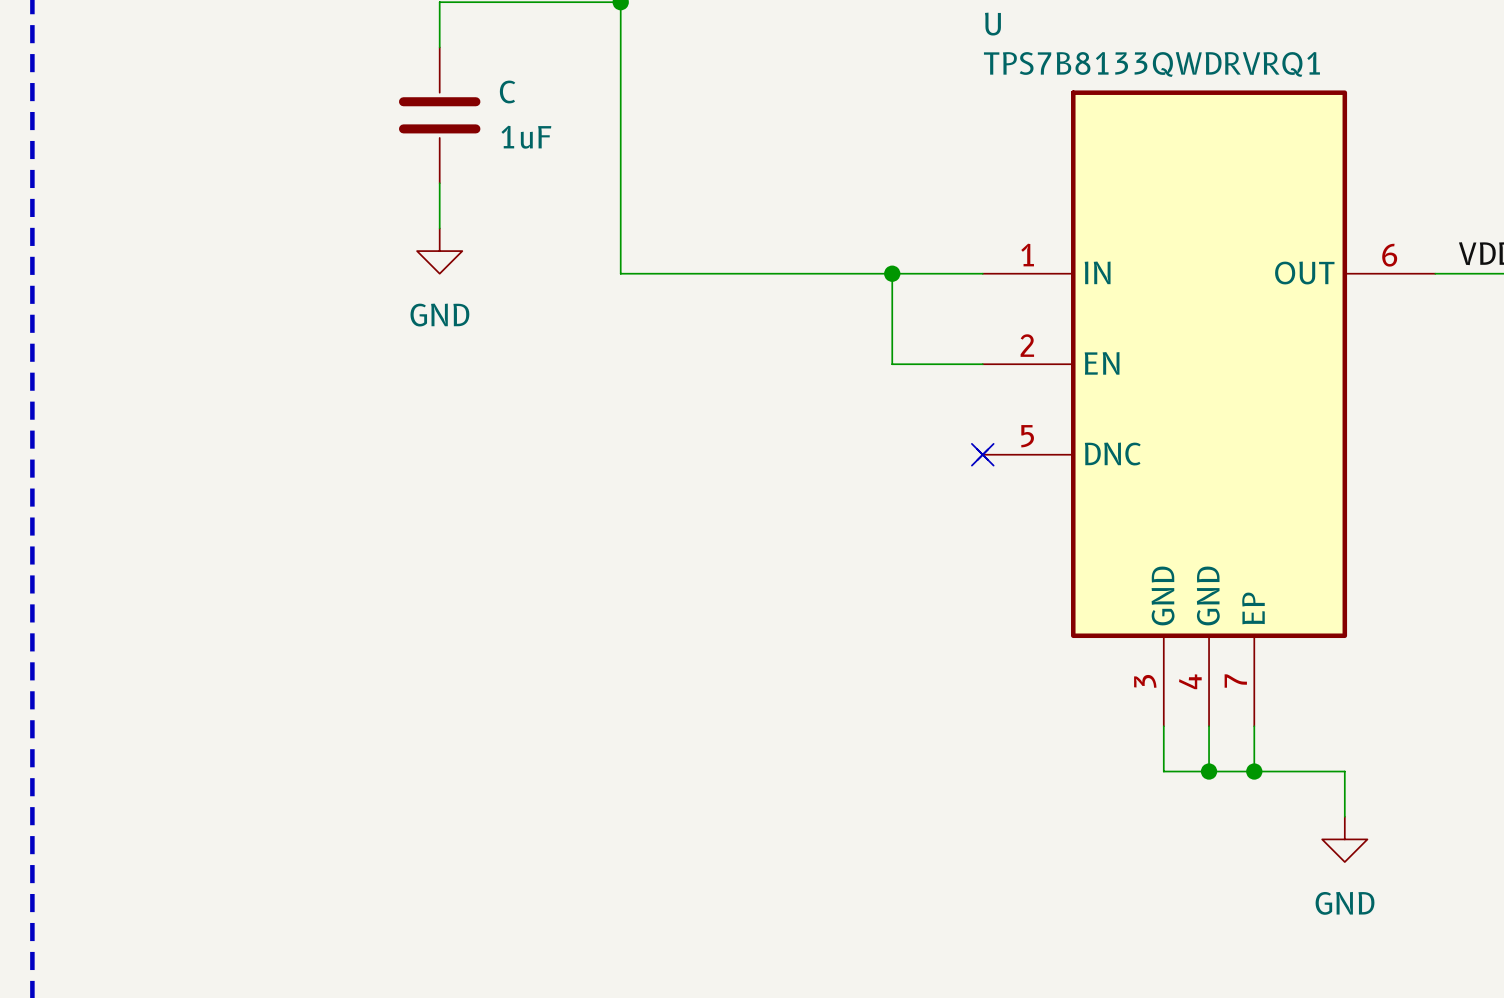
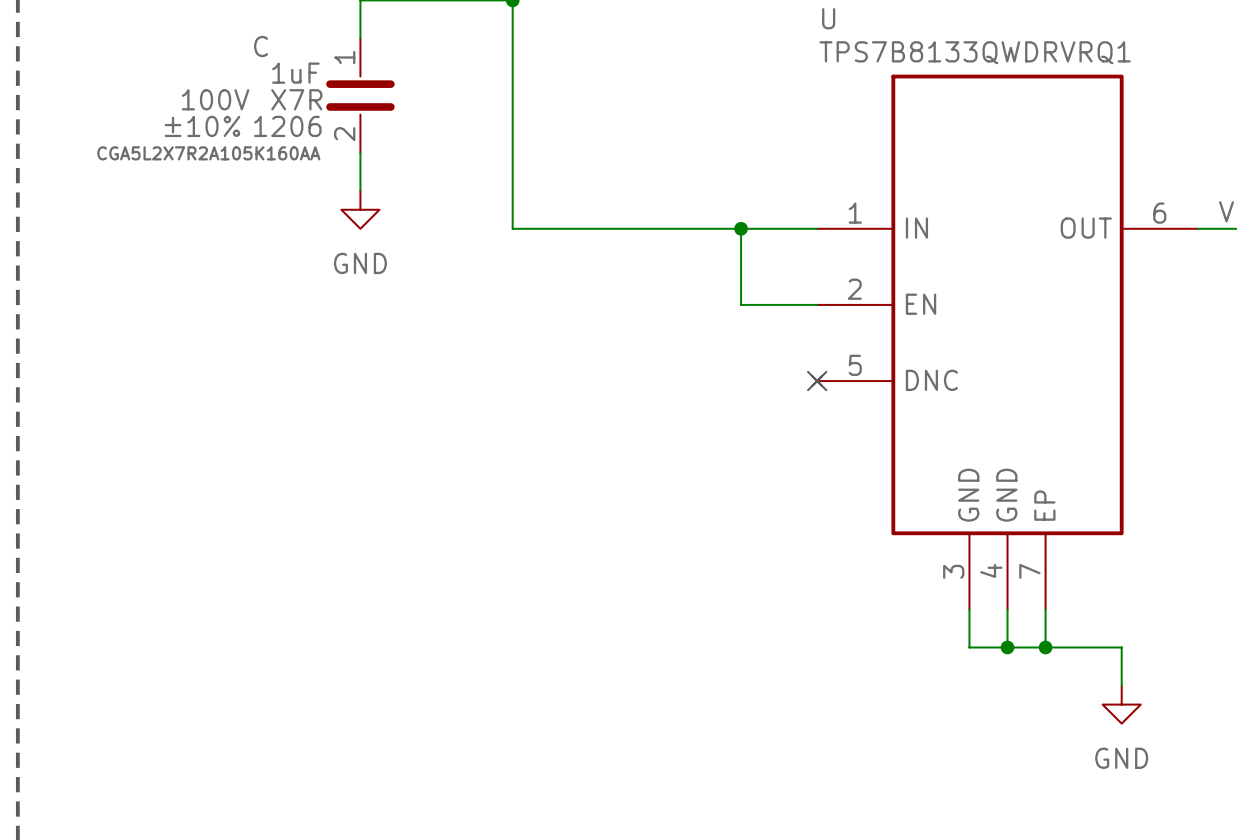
C pin number: none -> 1 (344, 57)
C name position: C (507, 91) -> C (261, 46)
C text: none -> 100V (215, 99)
C text: none -> X7R (296, 99)
C value position: 1uF (526, 137) -> 1uF (295, 73)
C text: none -> ±10% (202, 126)
C text: none -> 1206 (287, 126)
C pin number: none -> 2 (344, 134)
C text: none -> CGA5L2X7R2A105K160AA (208, 153)

